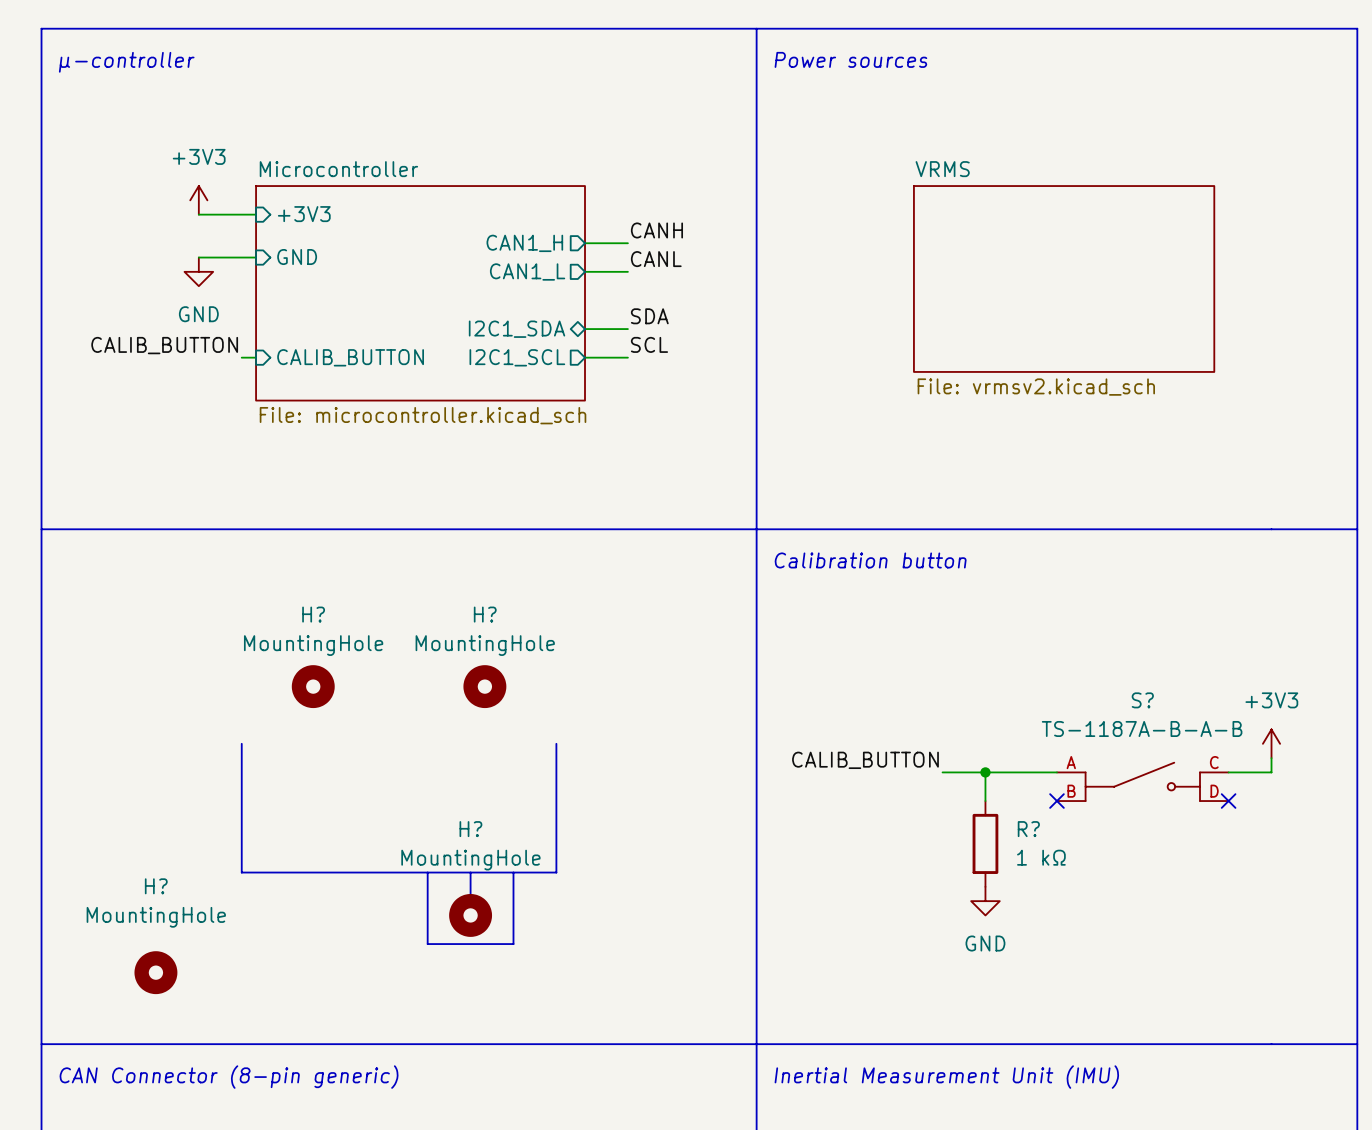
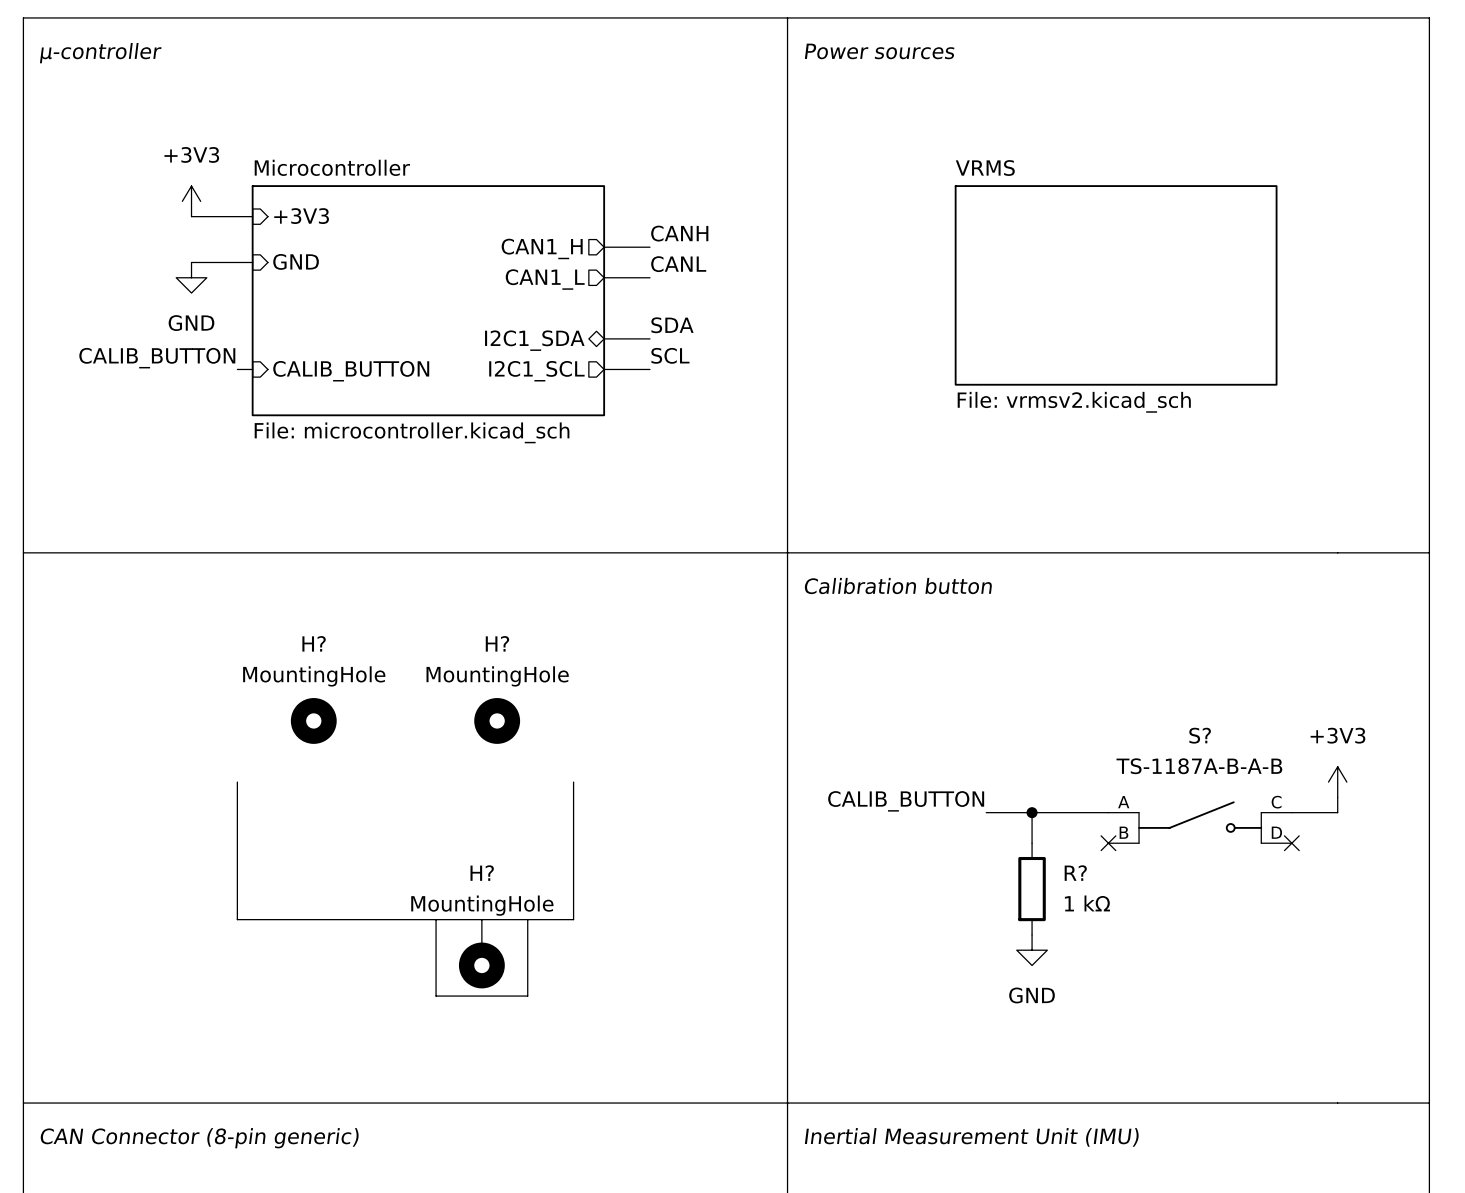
H?: MountingHole (155, 972) -> none

